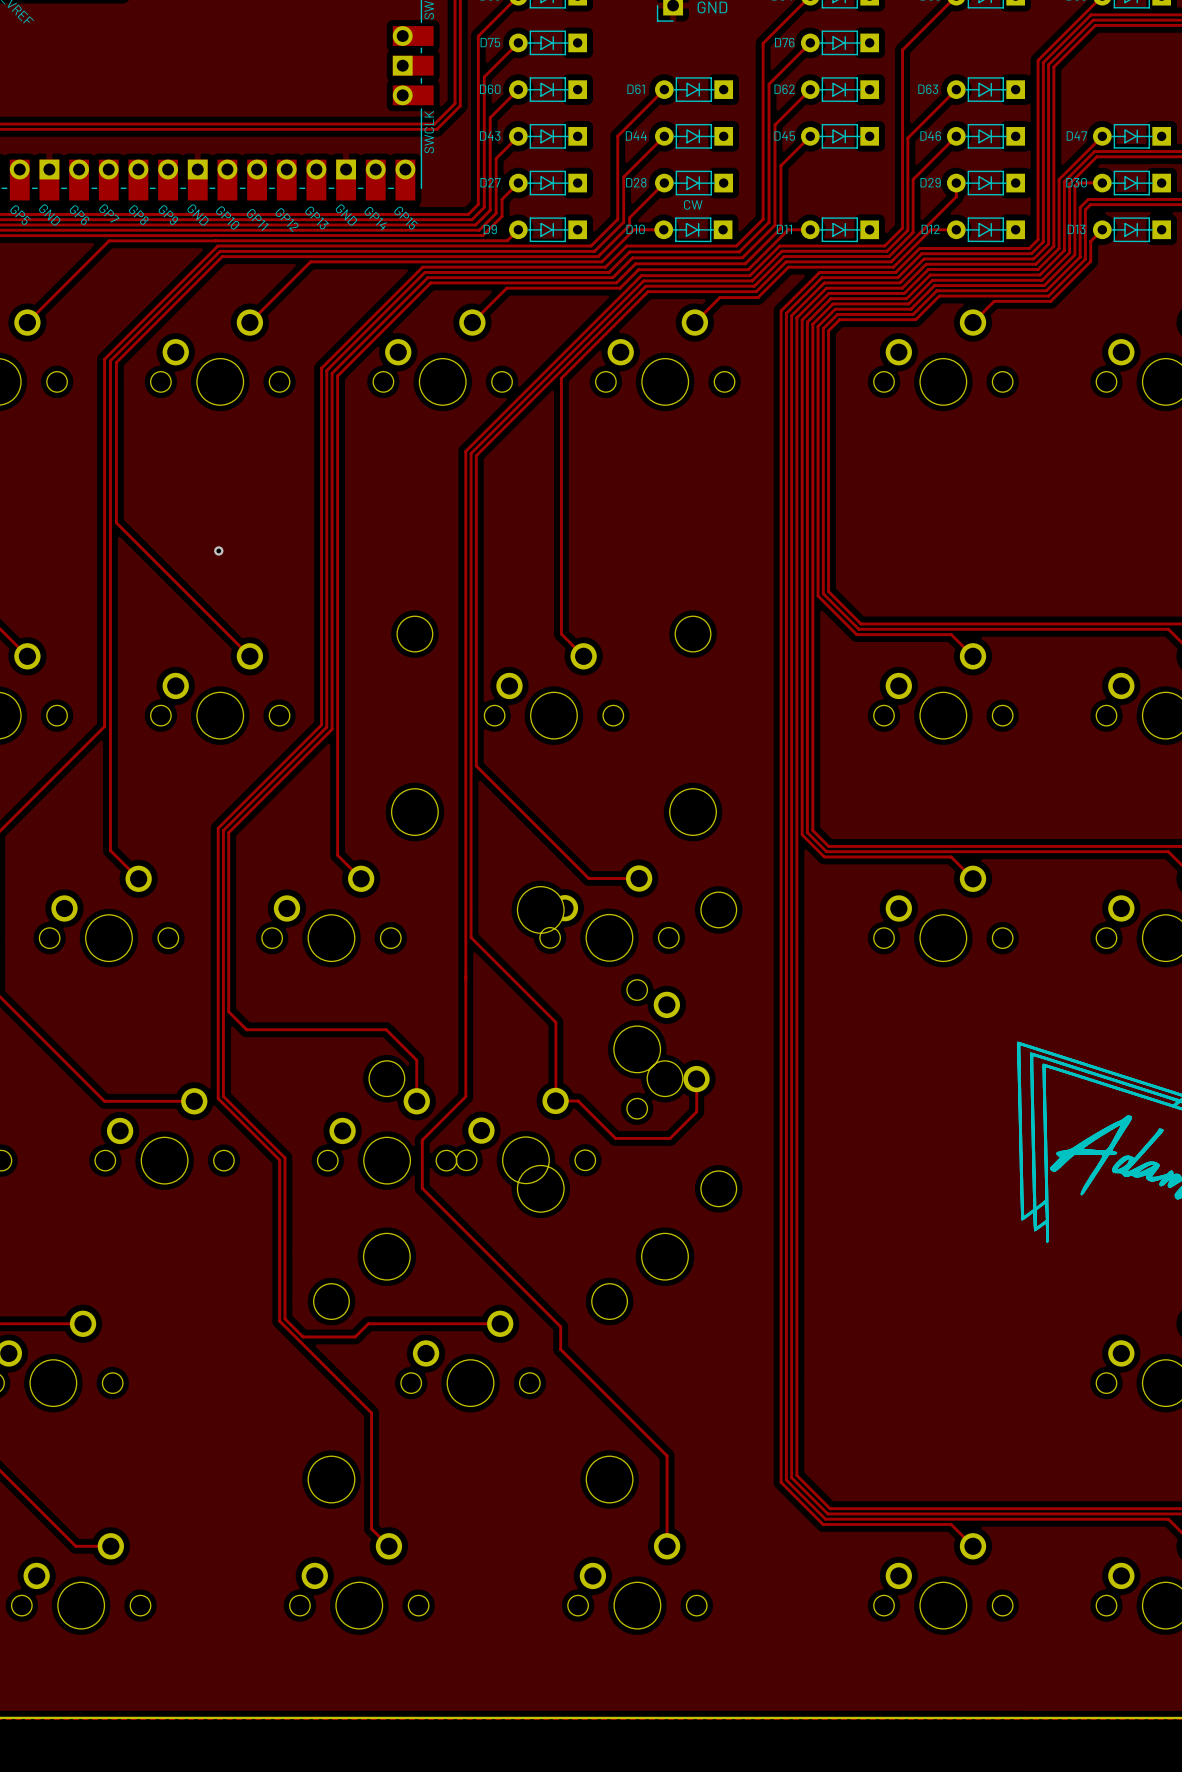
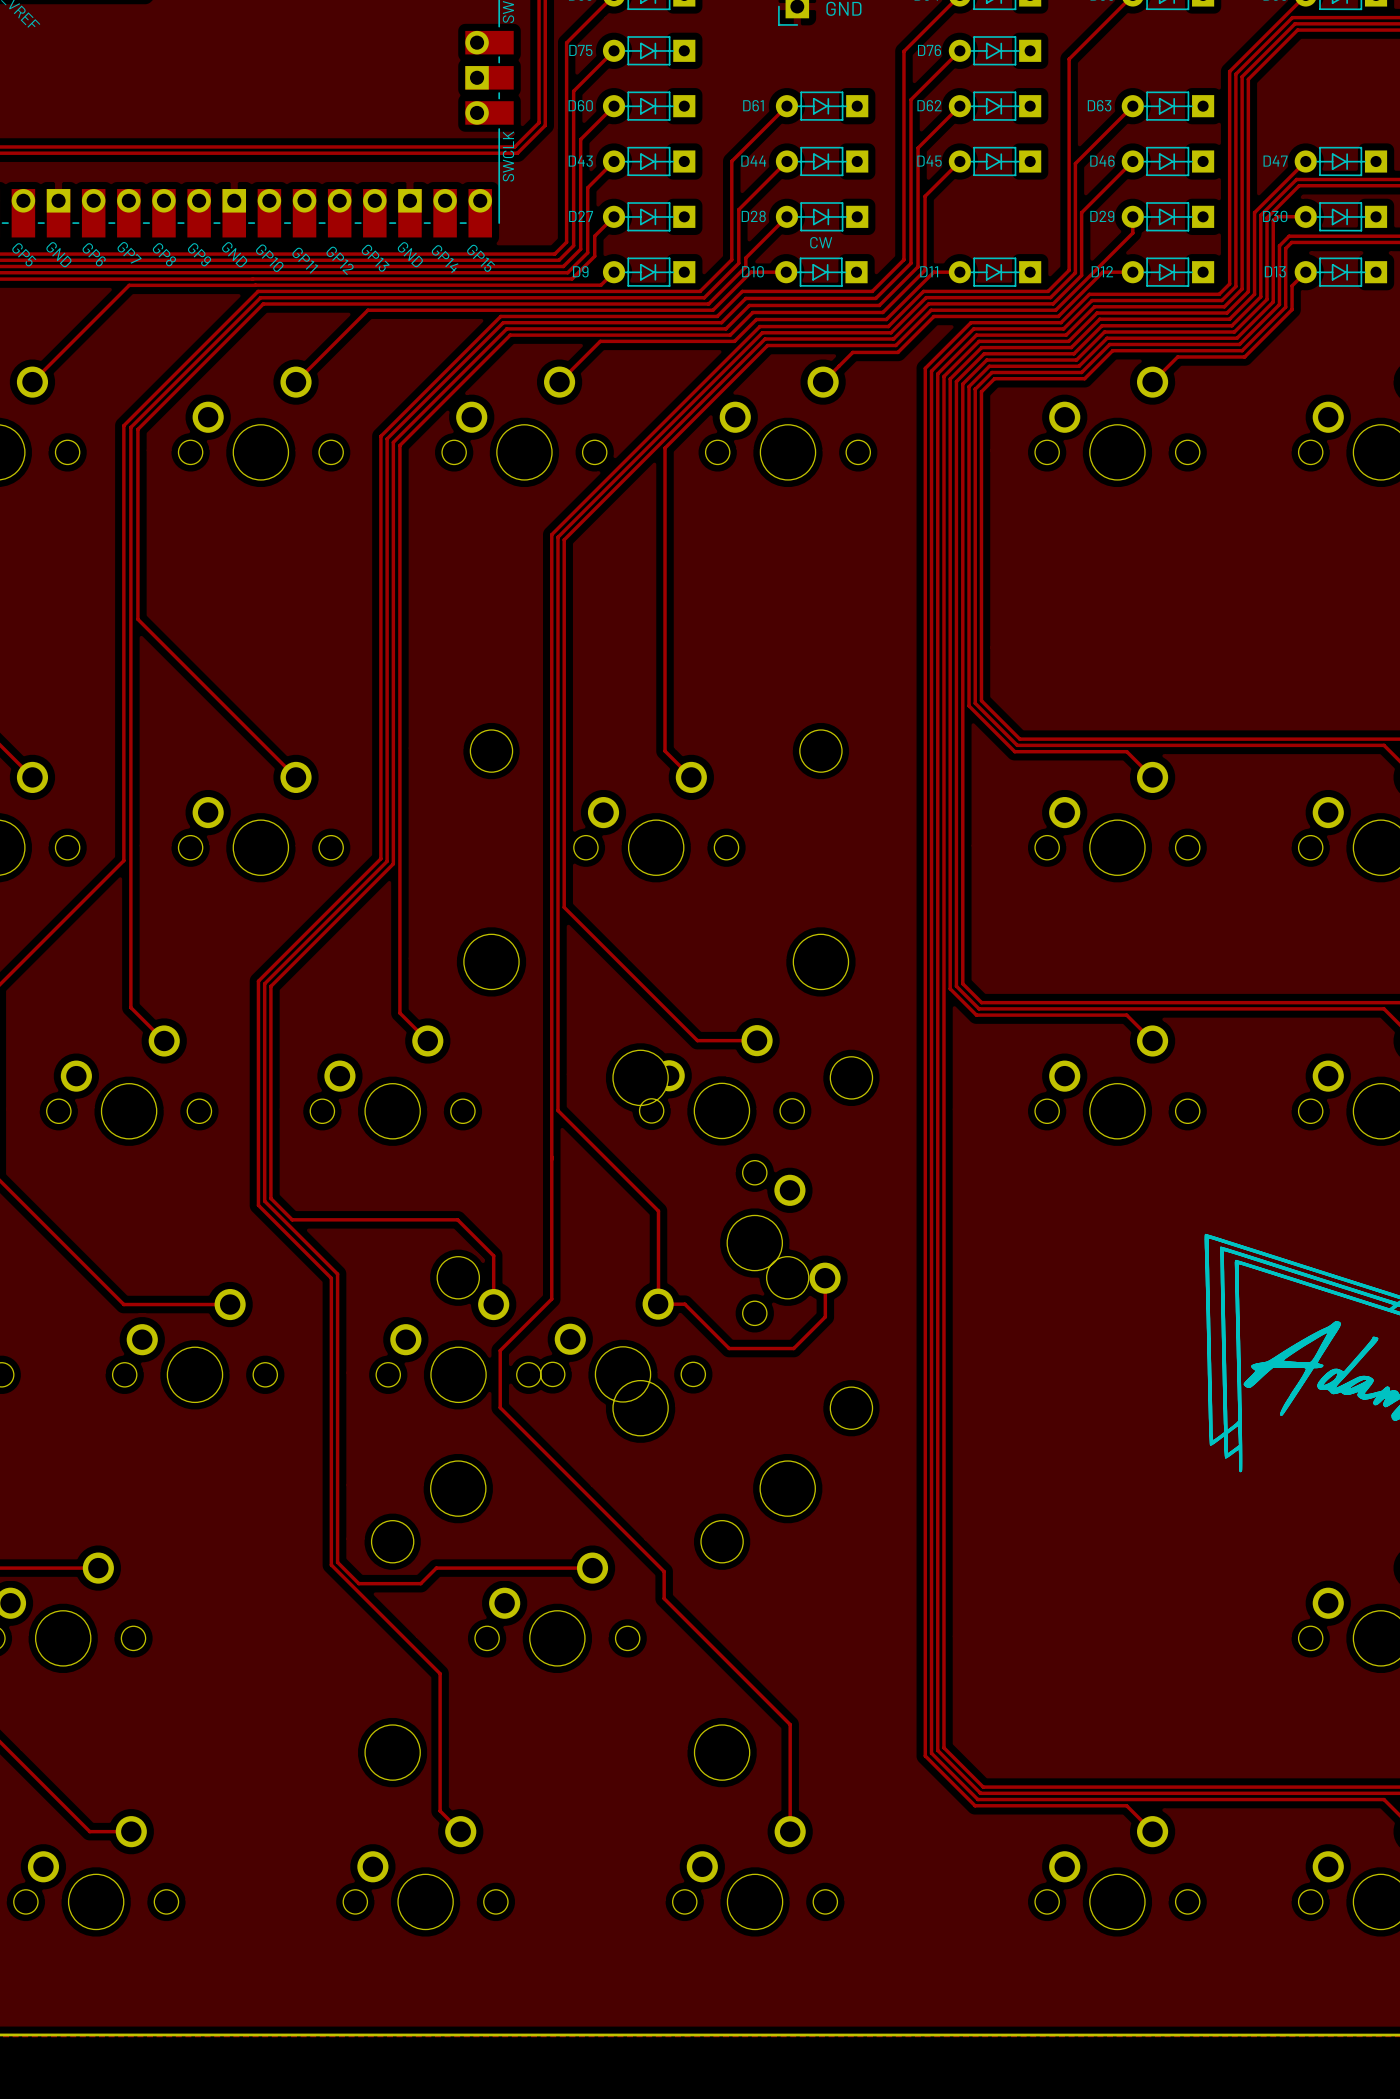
via: (218, 550) -> none
track: (223, 1014) (223, 1096) (284, 1157) -> (264, 1201) (337, 1274) (337, 1371)
track: (218, 1017) (218, 1098) (279, 1160) -> (258, 1205) (331, 1278) (331, 1374)

